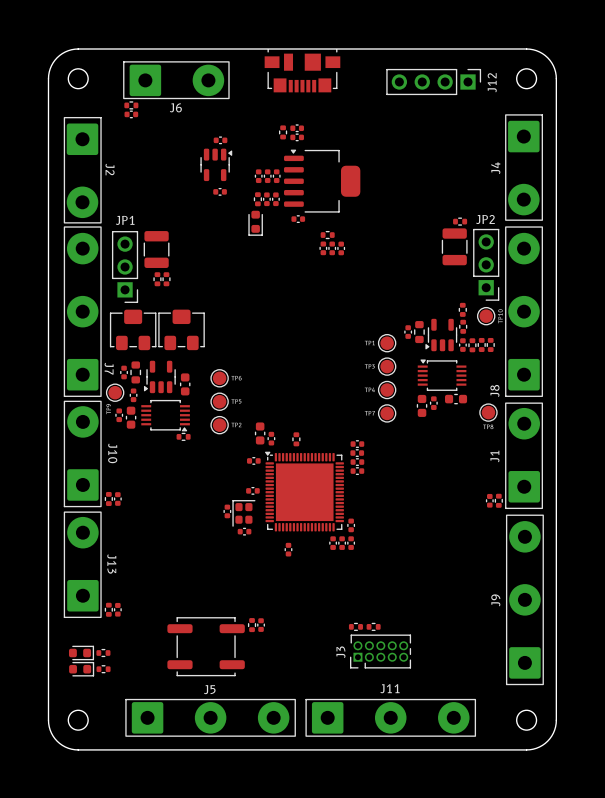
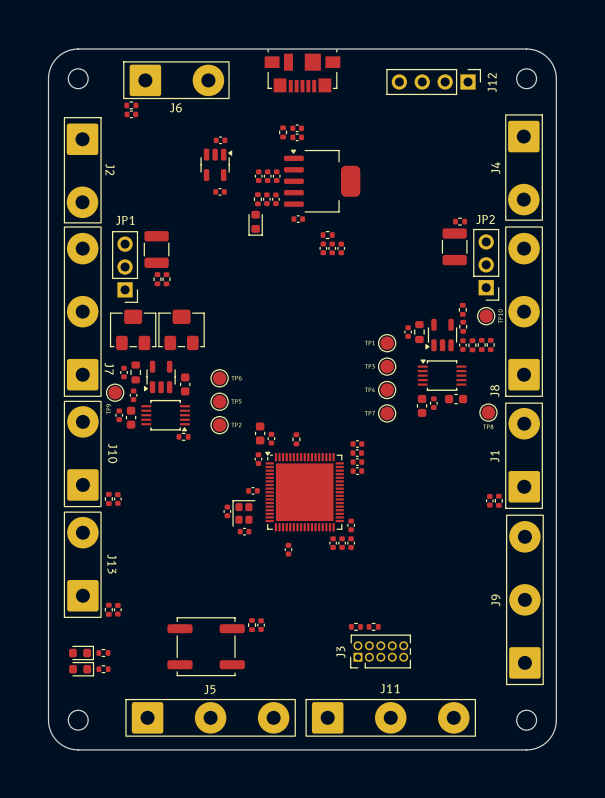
part rotation: 0° (253, 460) -> 90° clockwise (258, 459)

